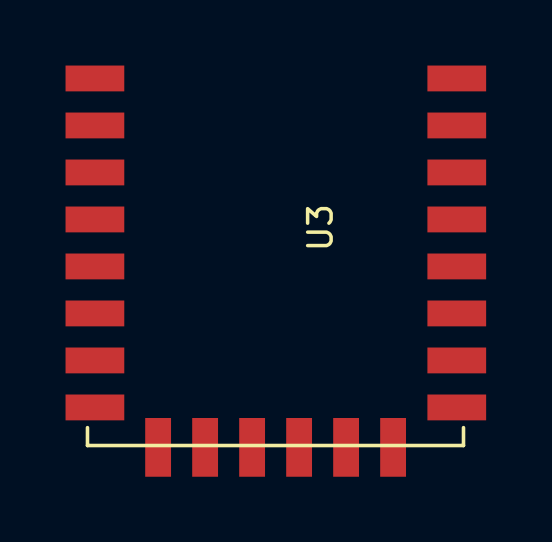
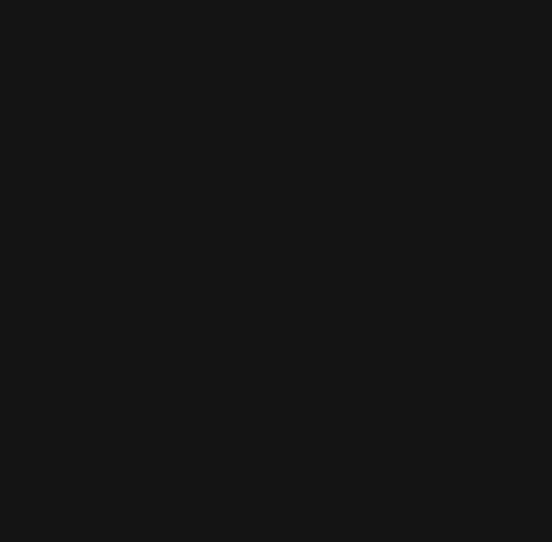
U3: (275, 271) -> none

